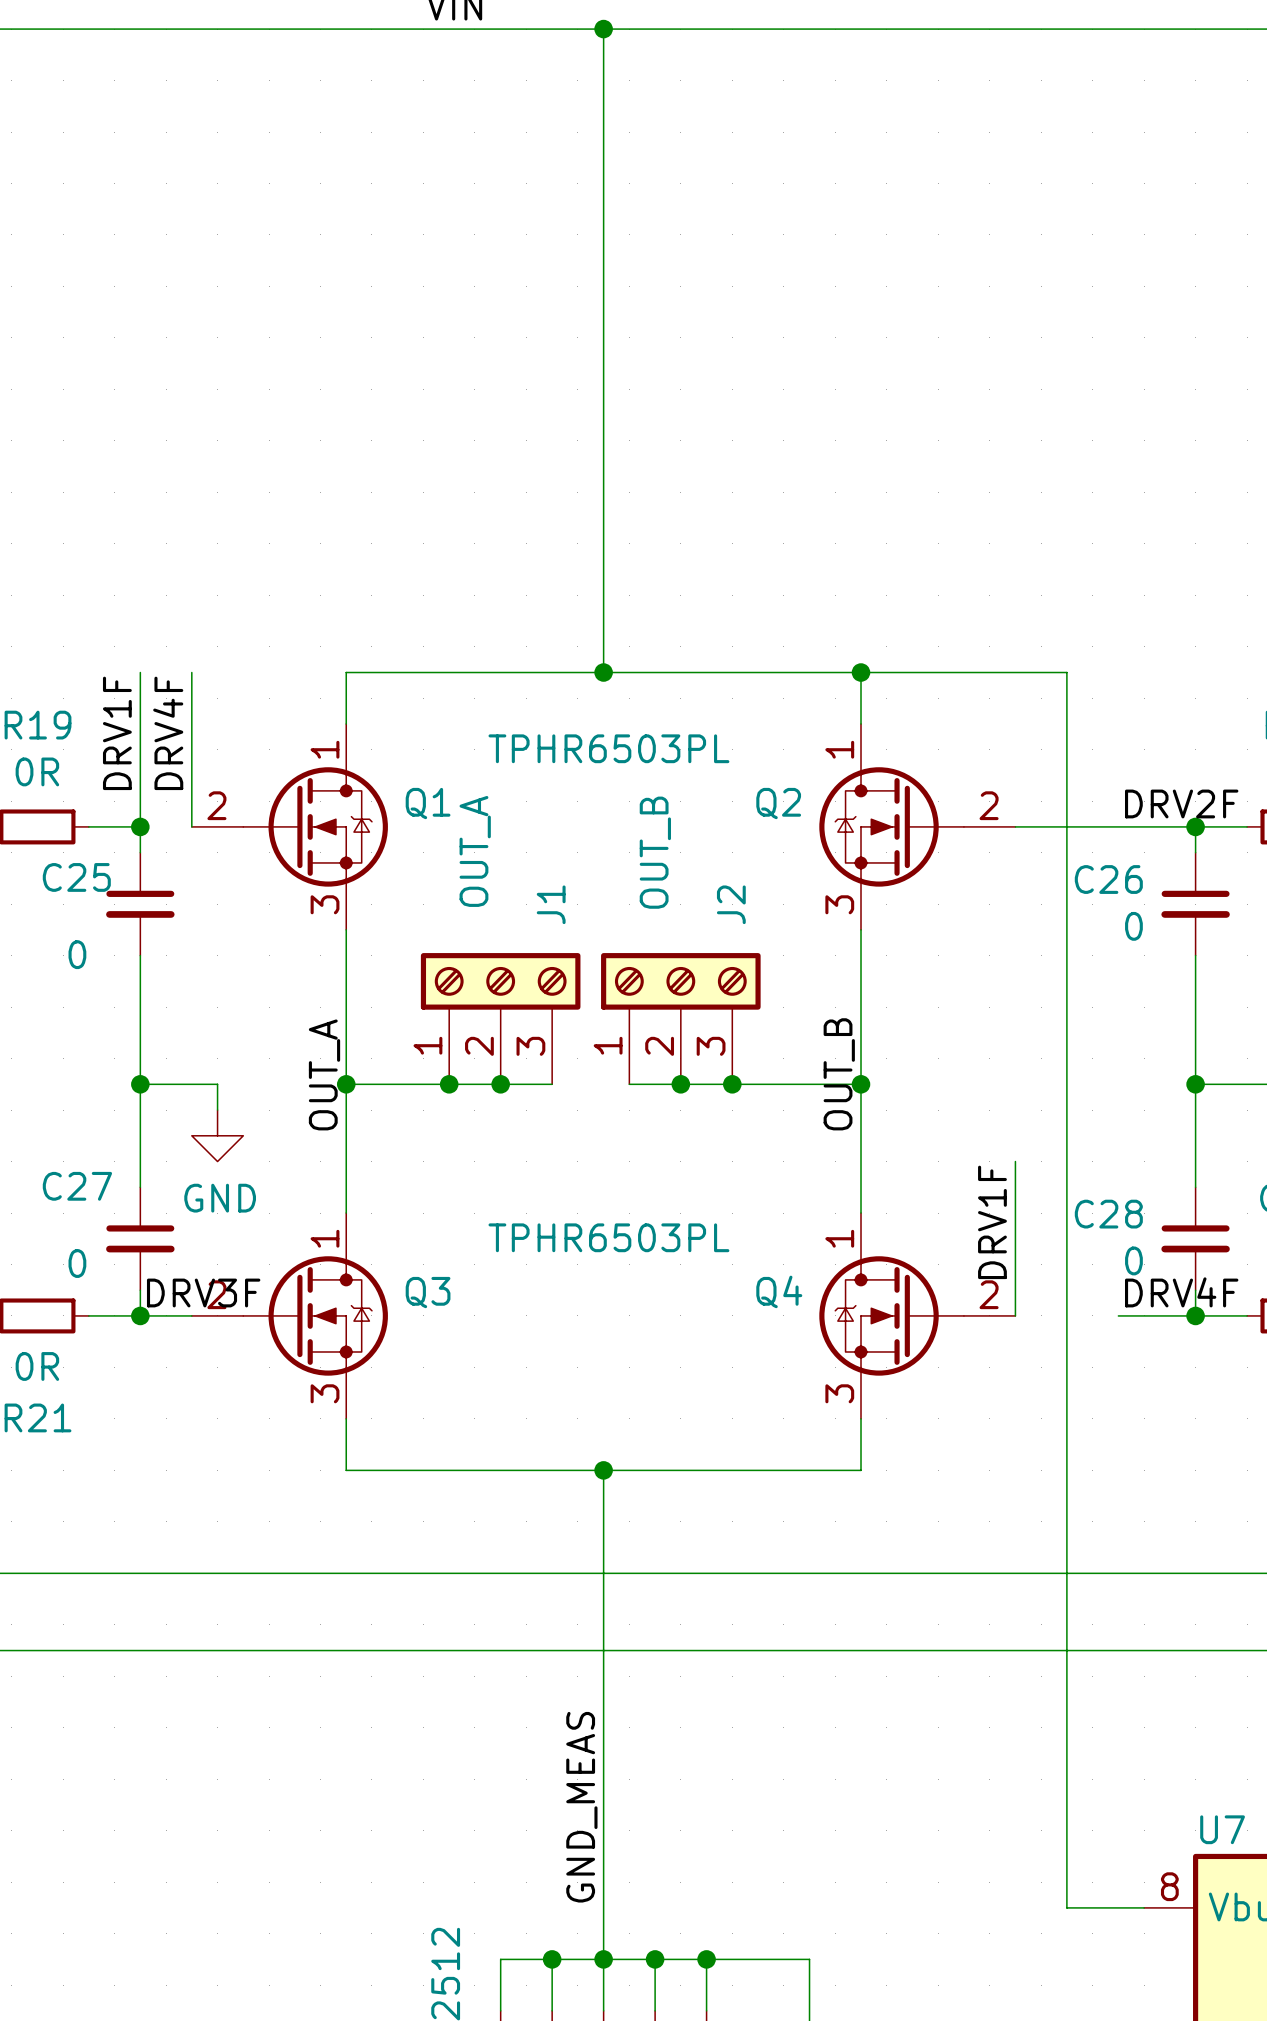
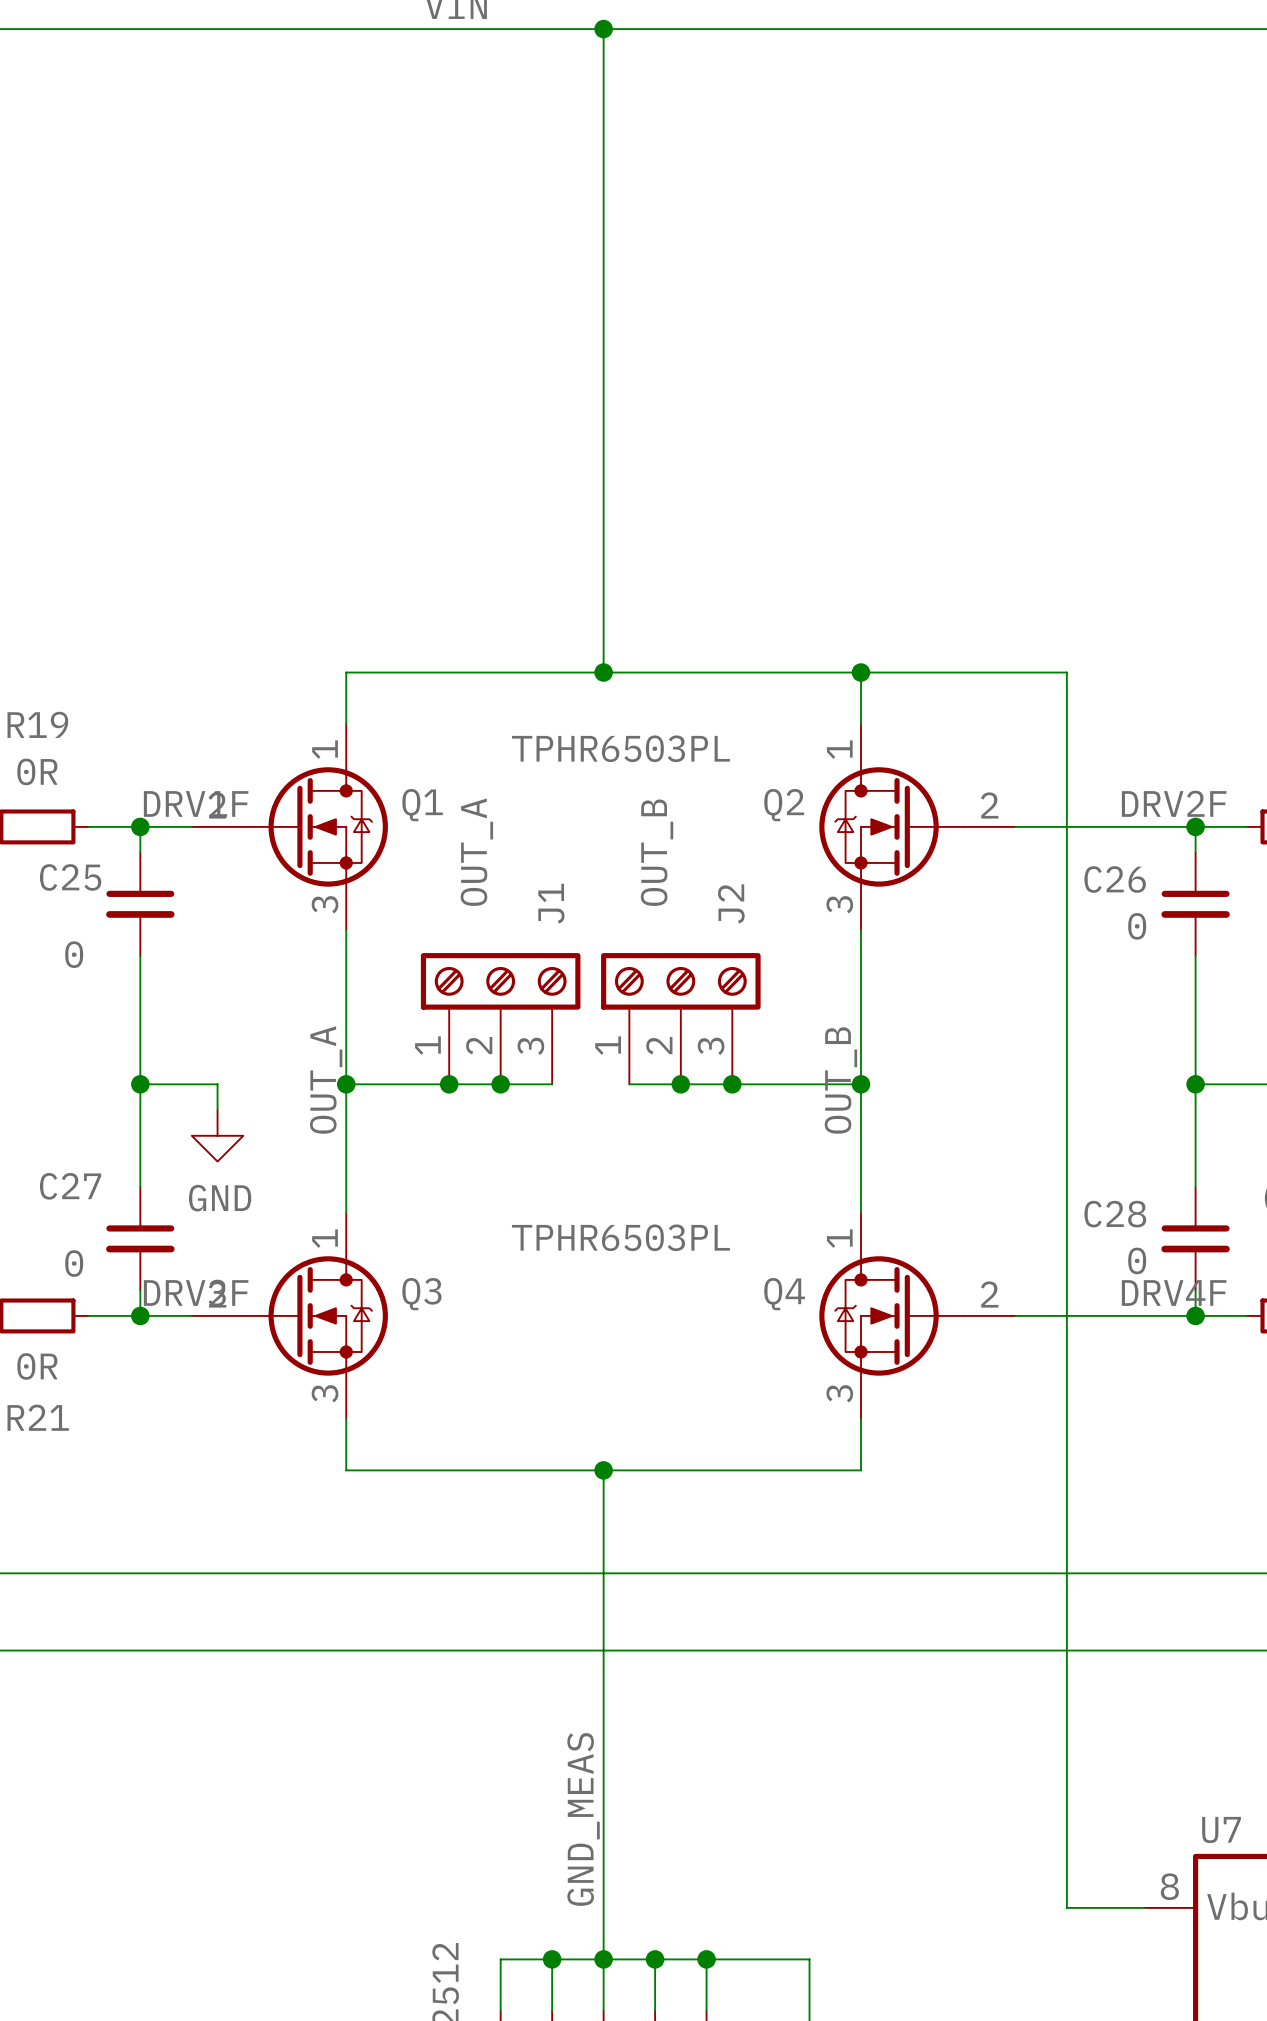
wire: (140, 672) (140, 826) -> (191, 826) (140, 826)
wire: (191, 672) (191, 826) -> none
label rotation: 0° (117, 733) -> 90° clockwise (196, 803)
label: DRV4F (168, 733) -> none
wire: (1015, 1161) (1015, 1315) -> (1118, 1315) (1015, 1315)
label: DRV1F (992, 1222) -> none

